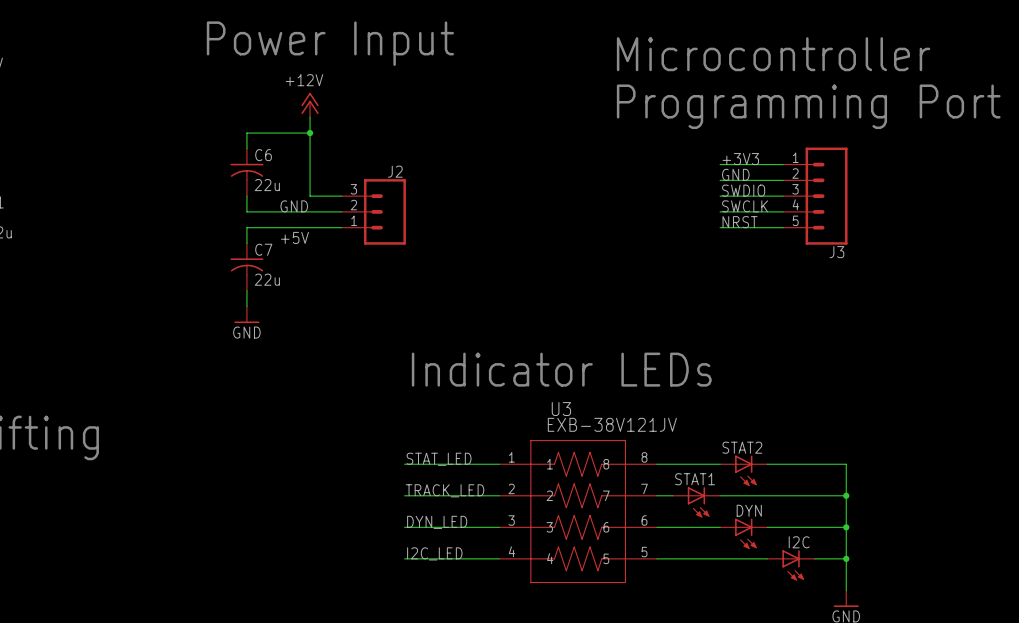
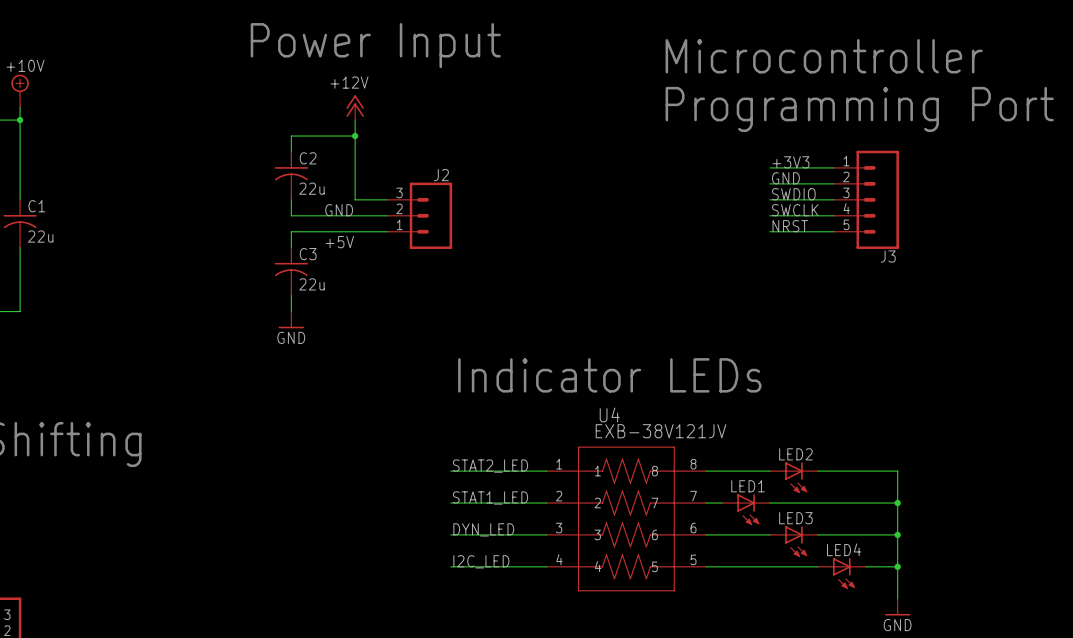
C6 name: C6 (263, 155) -> C2 (308, 158)
C7 name: C7 (263, 249) -> C3 (308, 254)
U3 name: U3 (561, 409) -> U4 (609, 414)
STAT2 name: STAT2 (742, 447) -> LED2 (795, 454)
label: STAT_LED (439, 459) -> STAT2_LED (490, 466)
STAT1 name: STAT1 (695, 479) -> LED1 (748, 486)
label: TRACK_LED (444, 490) -> STAT1_LED (490, 497)
DYN name: DYN (749, 510) -> LED3 (795, 518)
I2C name: I2C (799, 542) -> LED4 (844, 549)

